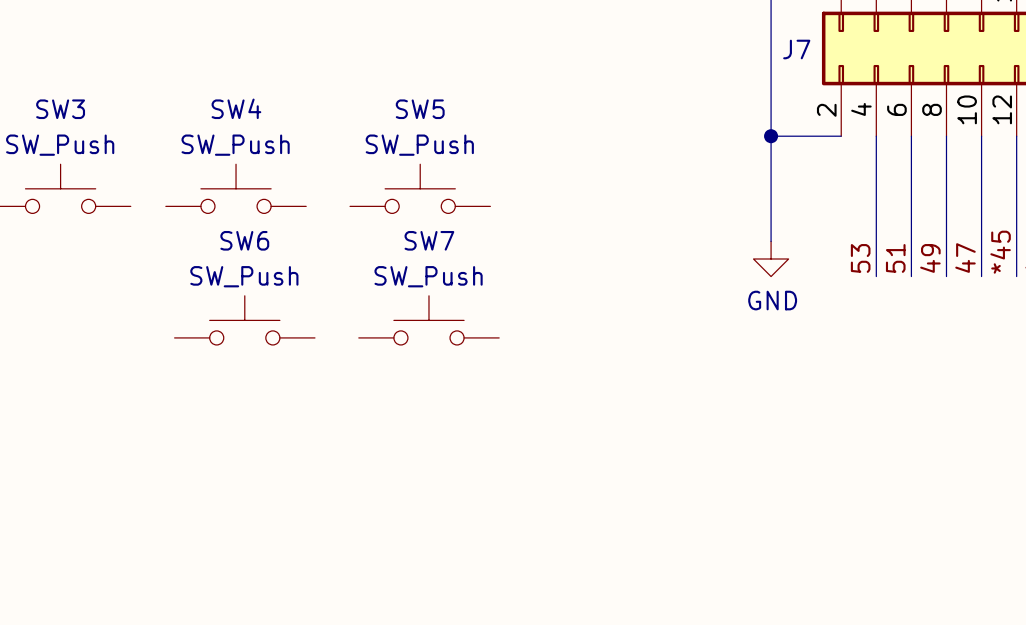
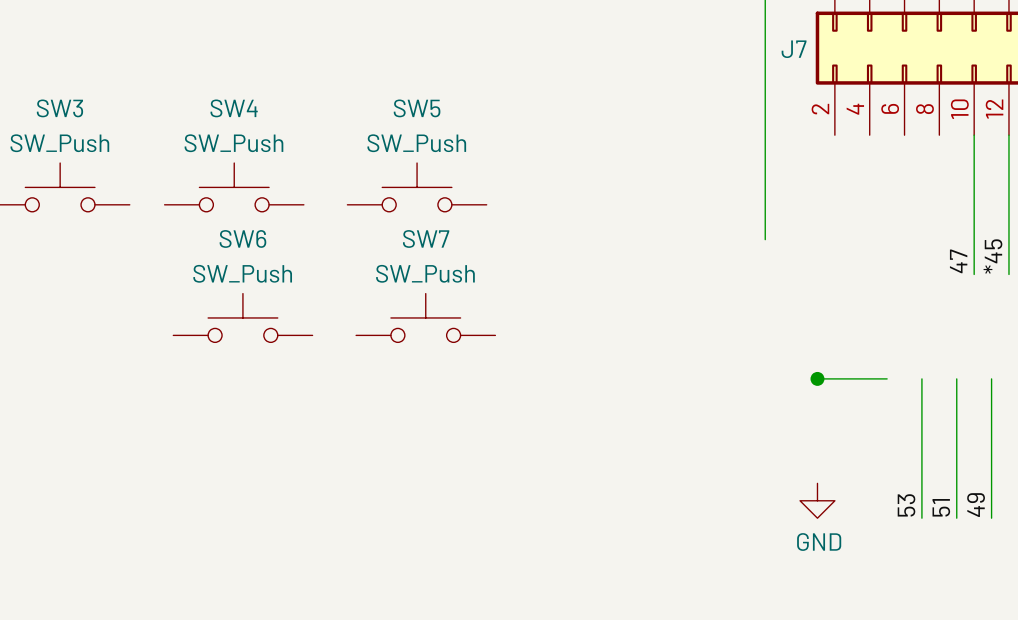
wire: (771, 136) (841, 136) -> (817, 378) (887, 378)
junction: (771, 136) -> none
wire: (876, 136) (876, 276) -> (921, 378) (921, 518)
wire: (911, 136) (911, 276) -> (956, 378) (956, 518)
wire: (946, 136) (946, 276) -> (991, 378) (991, 518)
label position: 53 (860, 258) -> 53 (906, 505)
label position: 51 (895, 258) -> 51 (941, 507)
label position: 49 (930, 258) -> 49 (976, 505)
power symbol position: GND (771, 259) -> GND (817, 500)
junction: none -> (817, 378)

